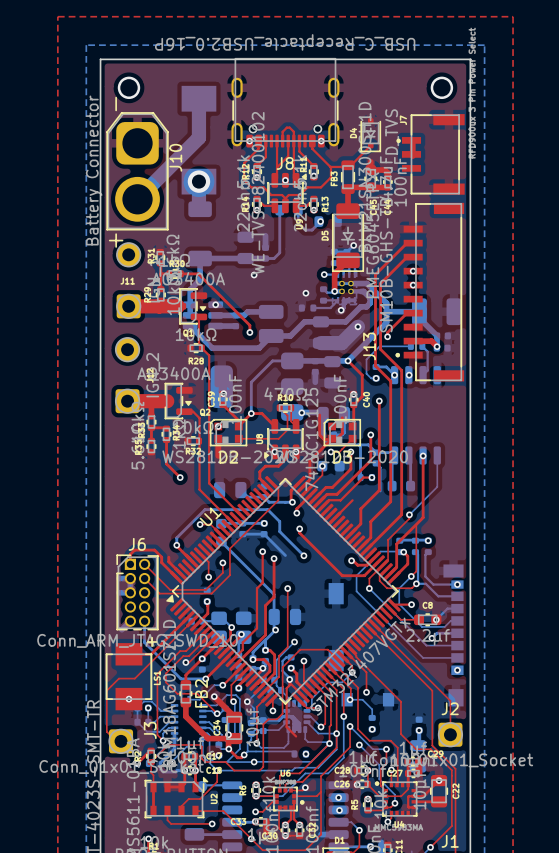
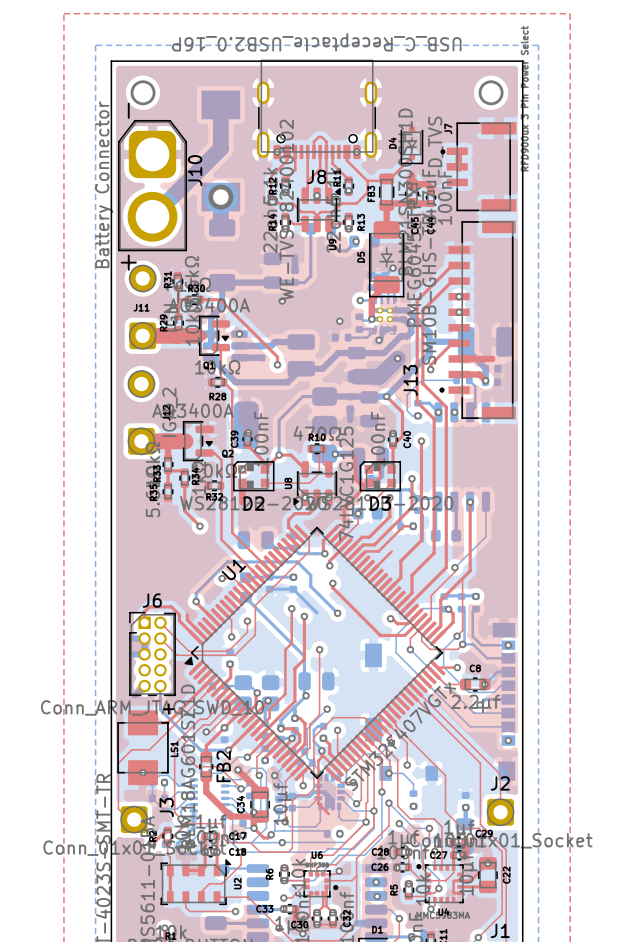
top track: none -> (459, 358) (492, 358)
via: none -> (302, 933)

